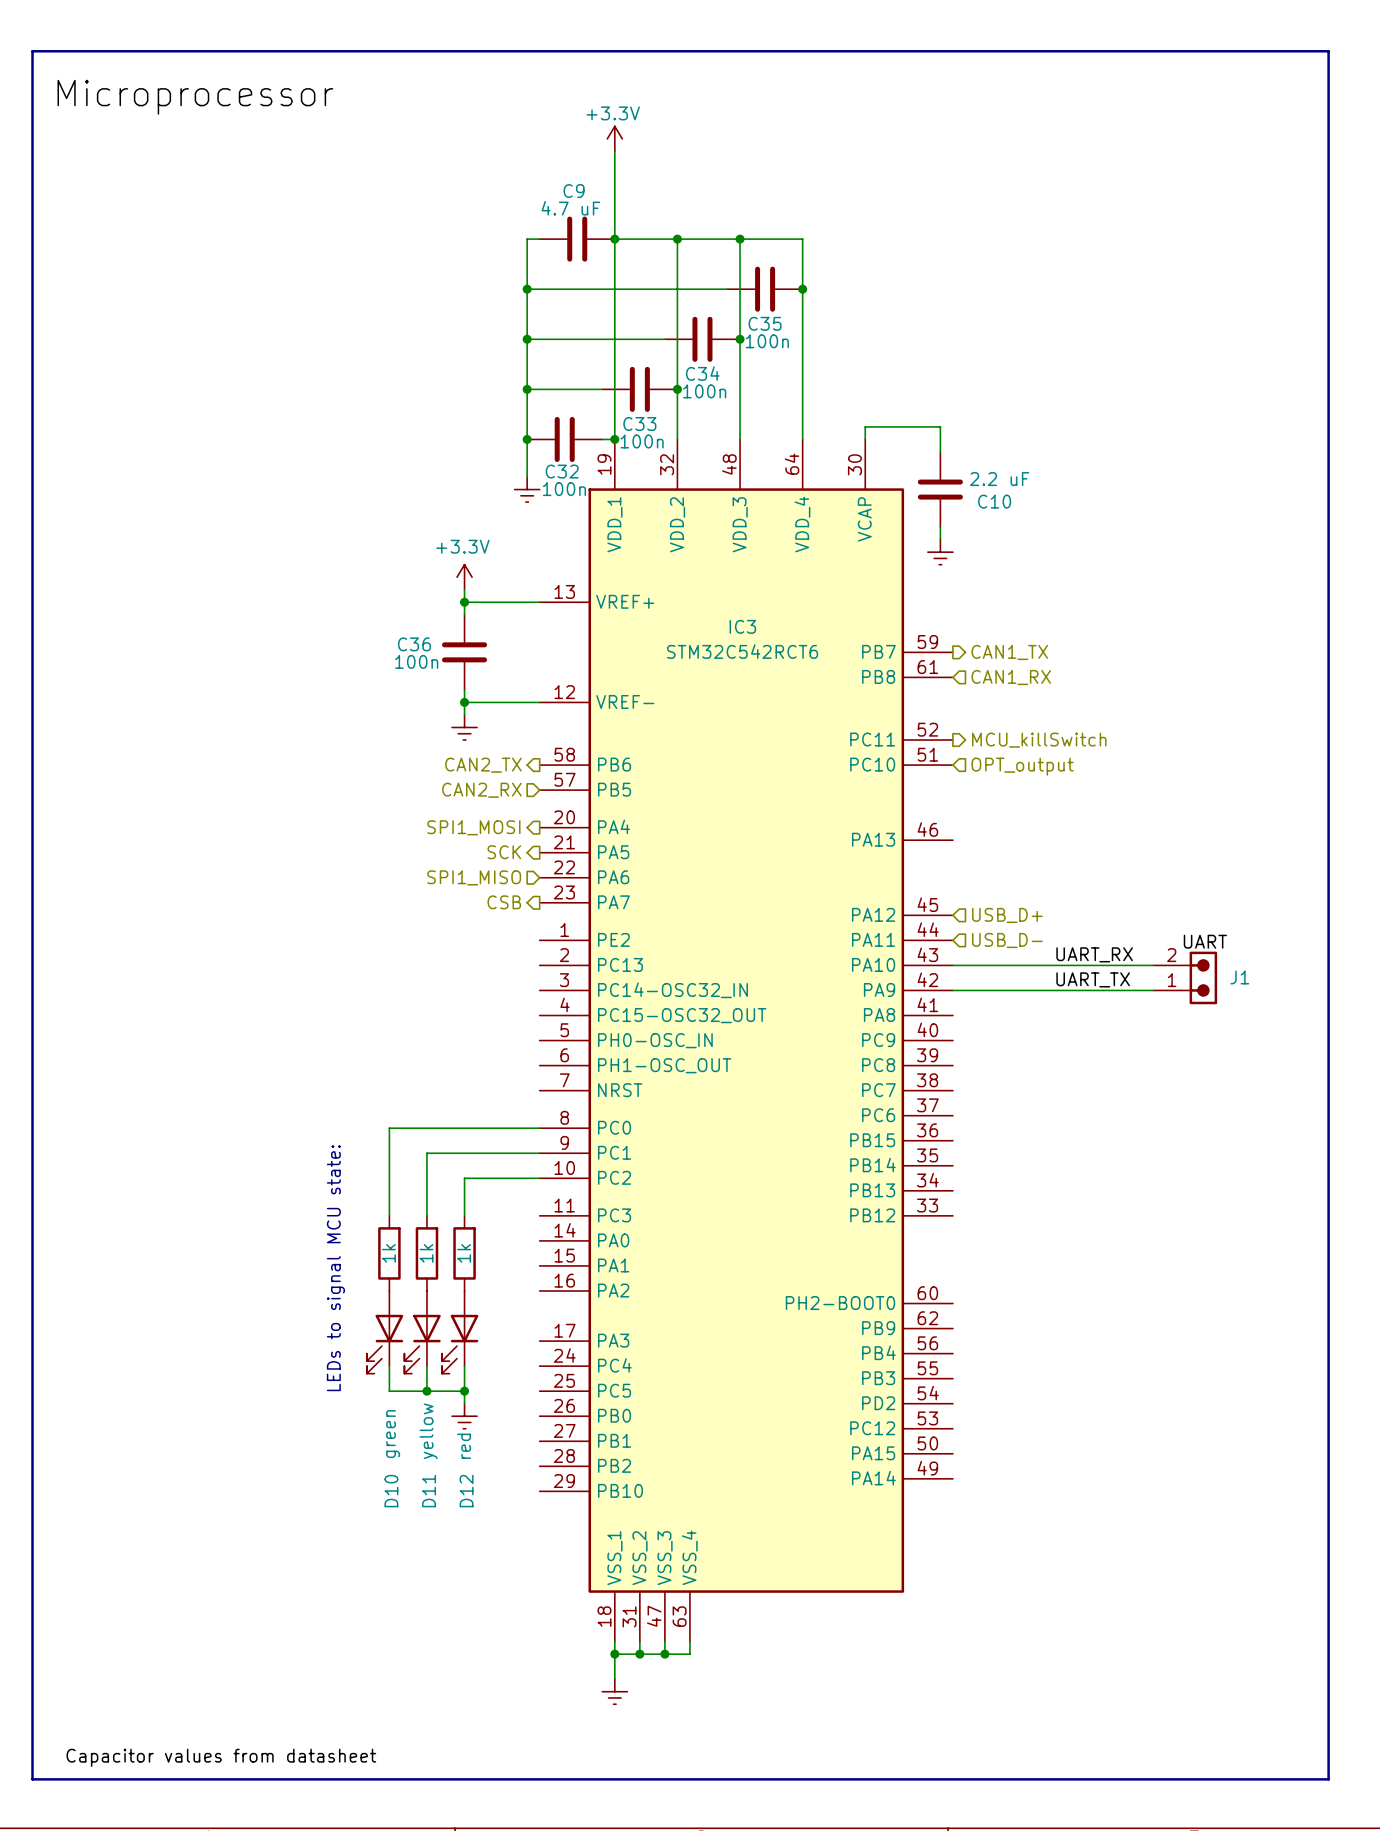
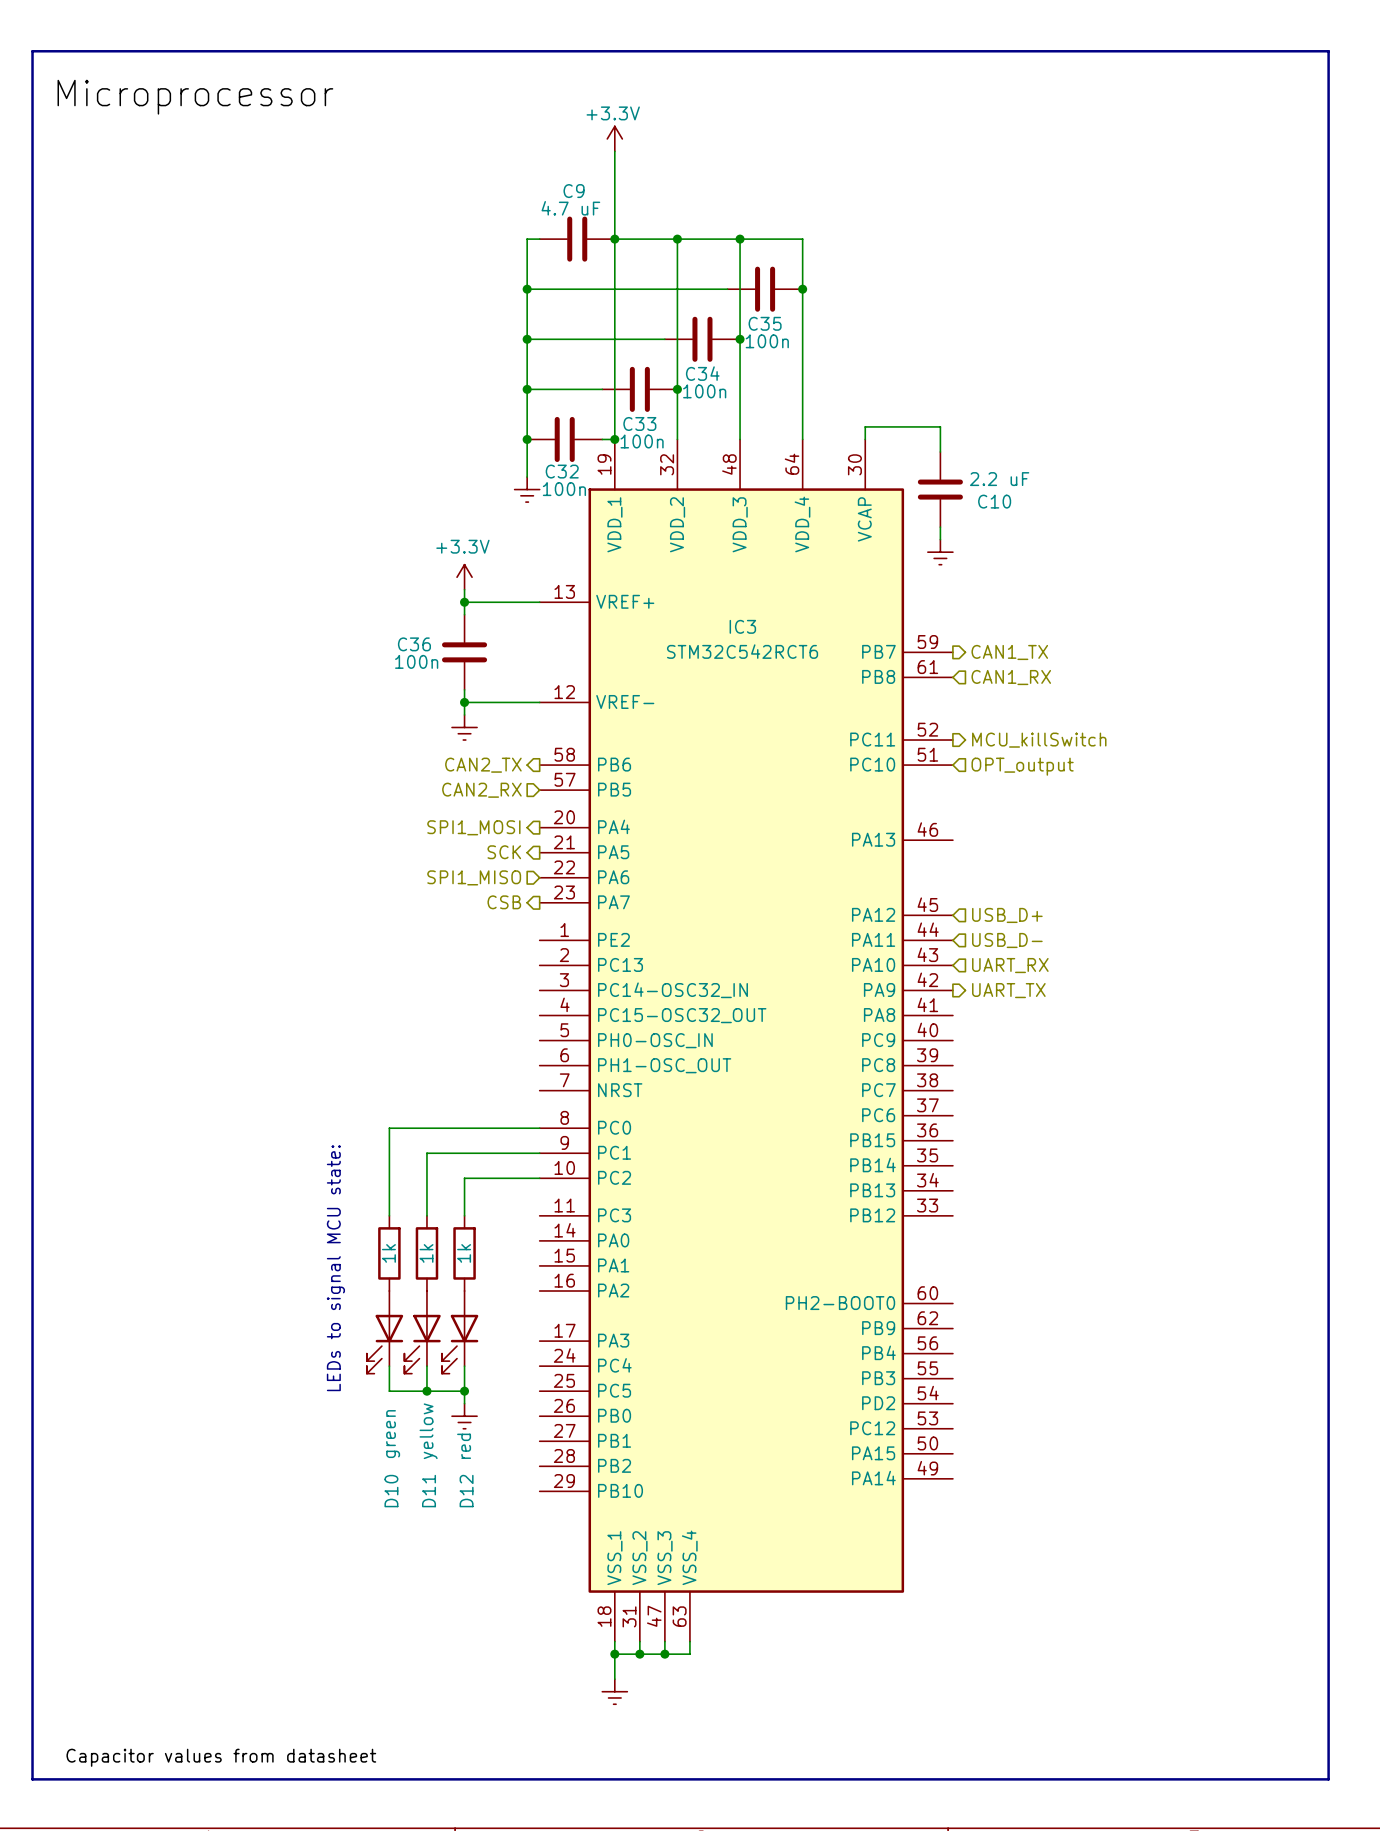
label: UART (1205, 941) -> none
label: UART_RX (1094, 954) -> none
wire: (952, 965) (1153, 965) -> none
hierarchical label: none -> UART_RX (1010, 965)
J1: (1185, 977) -> none
label: UART_TX (1093, 979) -> none
wire: (952, 990) (1153, 990) -> none
hierarchical label: none -> UART_TX (1008, 990)

